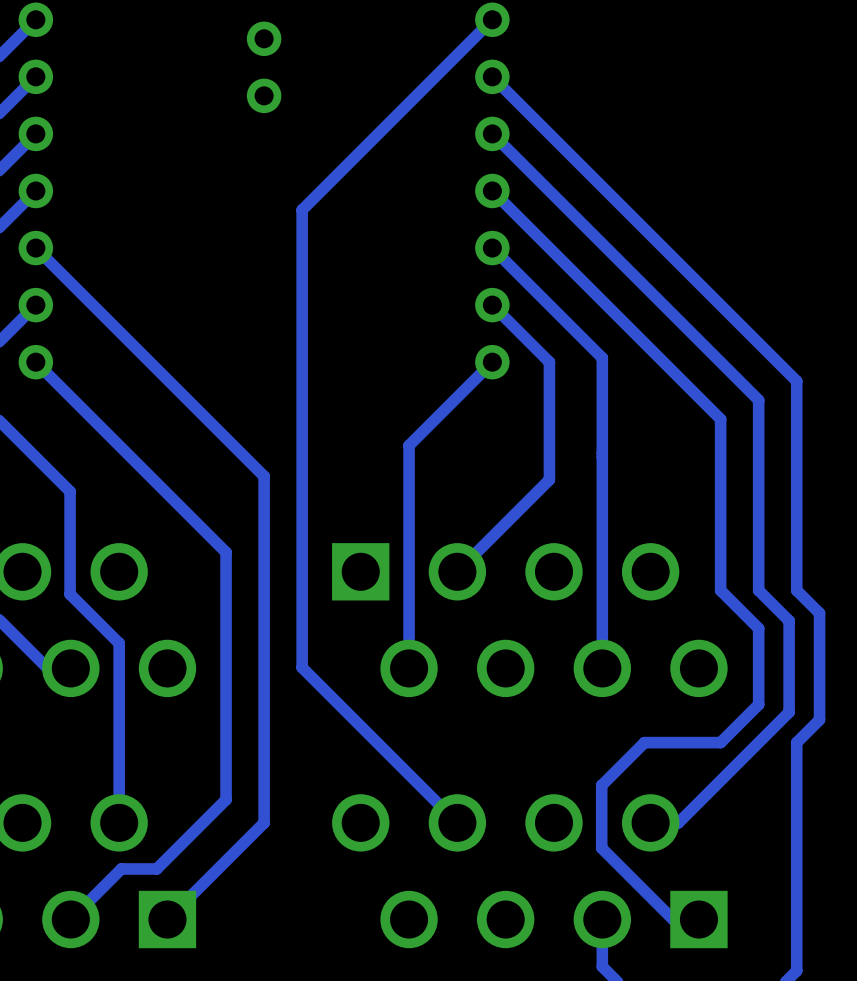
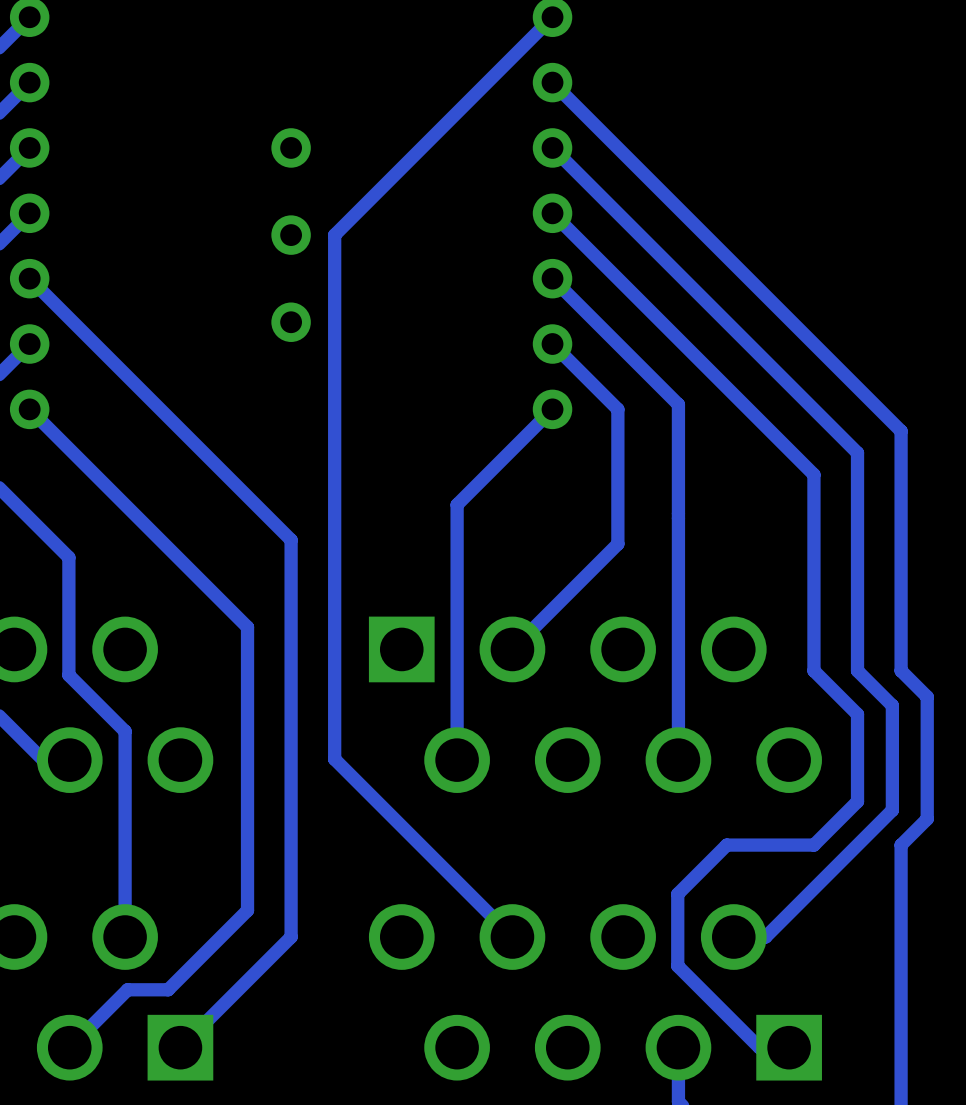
via: (264, 38) -> none
via position: (264, 95) -> (291, 147)
via: none -> (291, 235)
via: none -> (291, 322)

